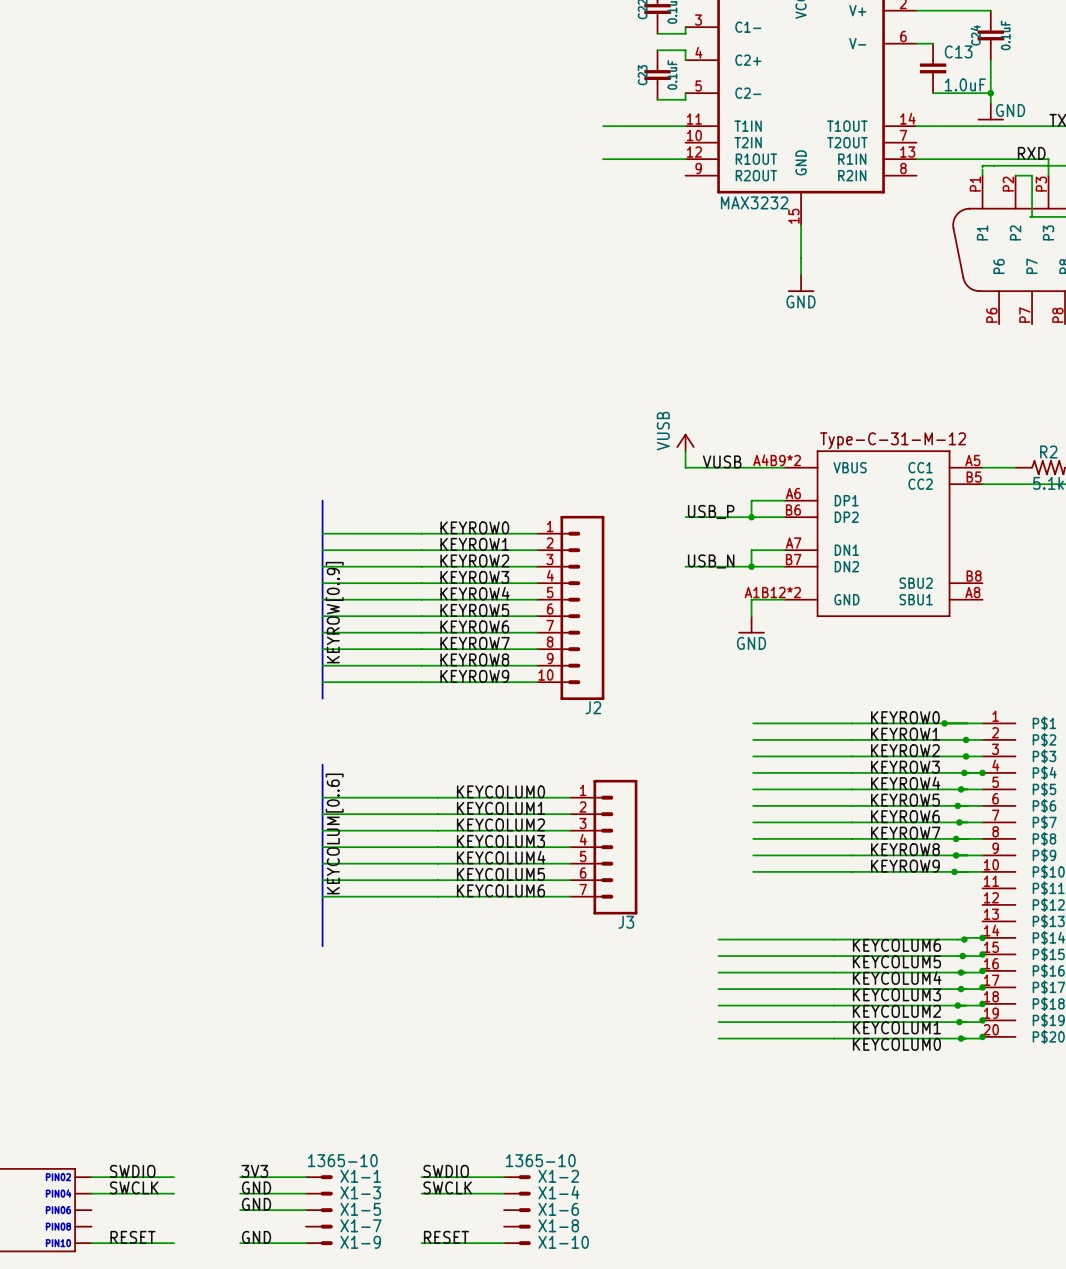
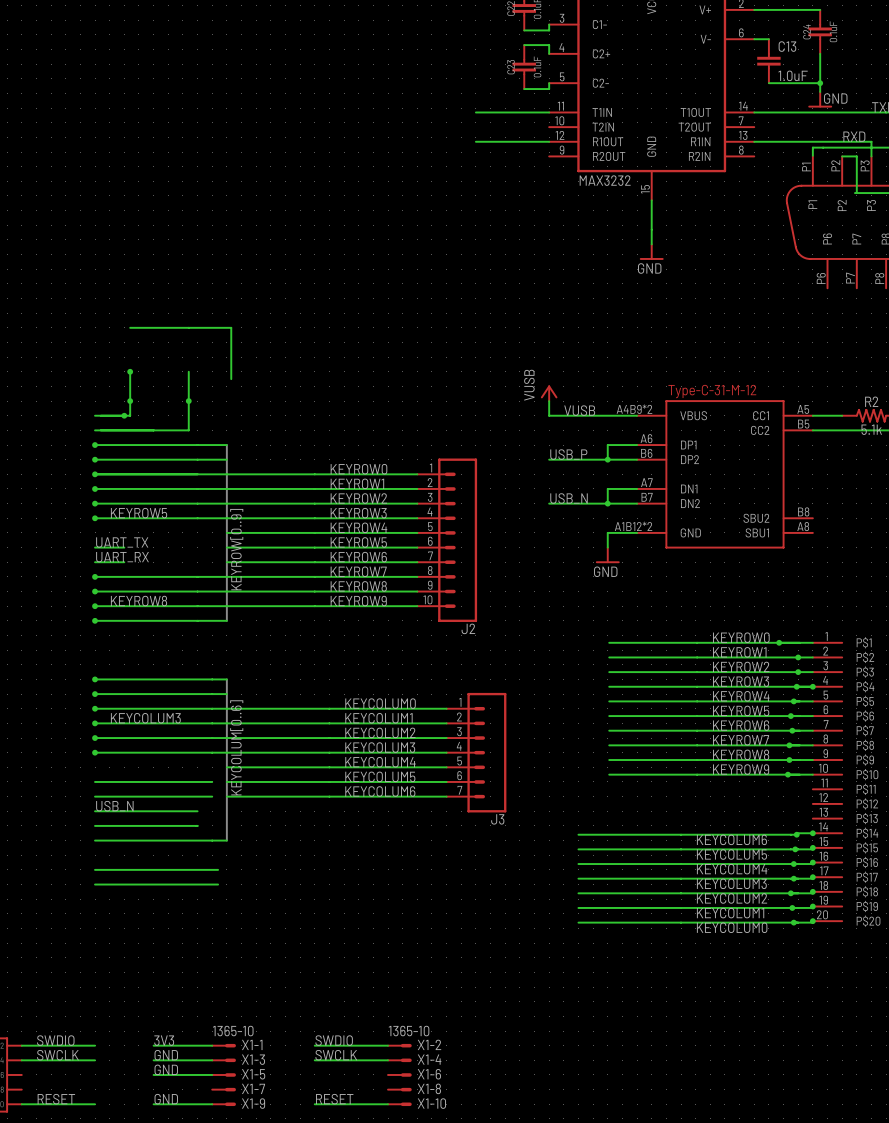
wire: none -> (130, 327) (231, 327) (231, 379)
wire: none -> (130, 371) (130, 415) (95, 415)
junction: none -> (130, 371)
wire: none -> (188, 371) (188, 430) (95, 430)
junction: none -> (130, 401)
junction: none -> (188, 401)
junction: none -> (124, 415)
wire: none -> (95, 445) (226, 445)
junction: none -> (95, 445)
wire: none -> (95, 459) (226, 459)
junction: none -> (95, 459)
wire: none -> (95, 474) (226, 474)
junction: none -> (95, 474)
wire: none -> (95, 488) (226, 488)
junction: none -> (95, 488)
wire: none -> (95, 503) (226, 503)
junction: none -> (95, 503)
label: none -> KEYROW5 (139, 513)
wire: none -> (95, 518) (226, 518)
junction: none -> (95, 518)
label: none -> UART_TX (122, 542)
wire: none -> (95, 547) (124, 547)
label: none -> UART_RX (122, 557)
wire: none -> (95, 562) (124, 562)
wire: none -> (95, 576) (226, 576)
junction: none -> (95, 576)
wire: none -> (95, 591) (226, 591)
junction: none -> (95, 591)
label: none -> KEYROW8 (138, 601)
wire: none -> (95, 606) (226, 606)
junction: none -> (95, 606)
wire: none -> (95, 620) (226, 620)
junction: none -> (95, 620)
wire: none -> (95, 679) (226, 679)
junction: none -> (95, 679)
wire: none -> (95, 694) (226, 694)
junction: none -> (95, 694)
wire: none -> (95, 708) (226, 708)
junction: none -> (95, 708)
label: none -> KEYCOLUM3 (145, 718)
wire: none -> (95, 723) (226, 723)
junction: none -> (95, 723)
wire: none -> (95, 738) (226, 738)
junction: none -> (95, 738)
wire: none -> (95, 752) (226, 752)
junction: none -> (95, 752)
wire: none -> (95, 781) (212, 781)
wire: none -> (95, 796) (212, 796)
label: none -> USB_N (114, 806)
wire: none -> (95, 811) (197, 811)
wire: none -> (95, 825) (197, 825)
wire: none -> (95, 840) (226, 840)
wire: none -> (95, 869) (218, 869)
wire: none -> (95, 884) (218, 884)

